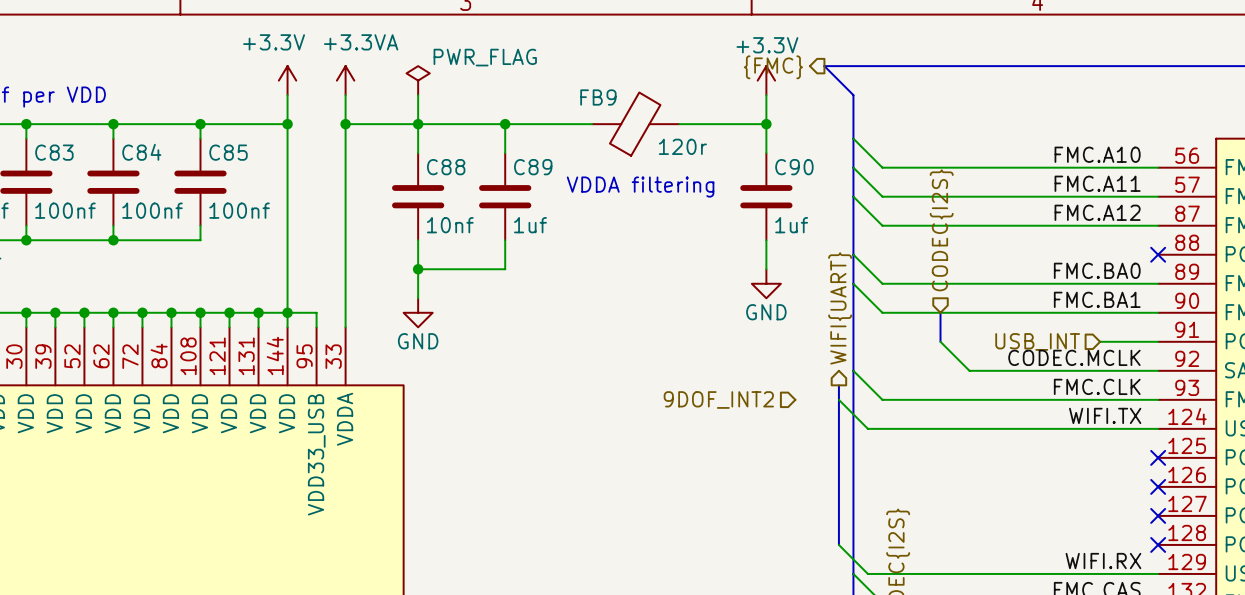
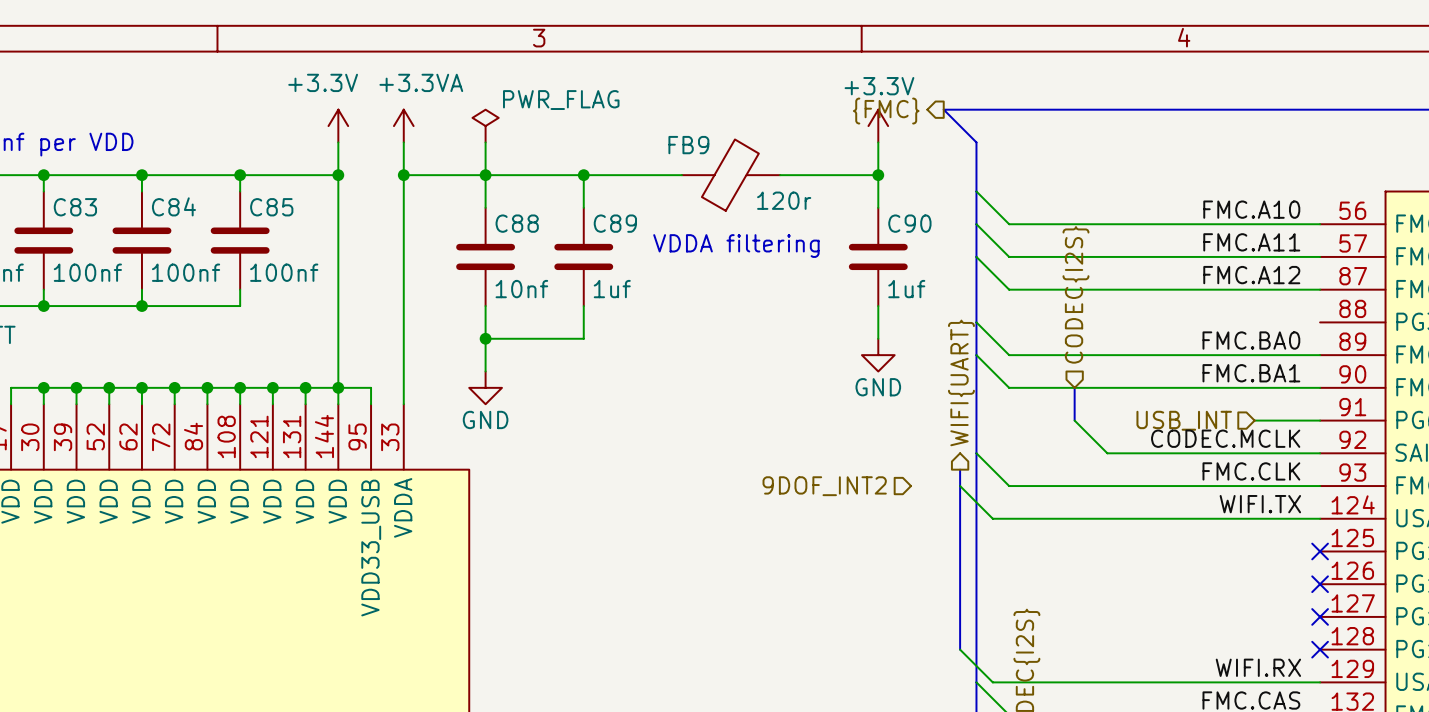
no-connect mark: (1158, 254) -> none

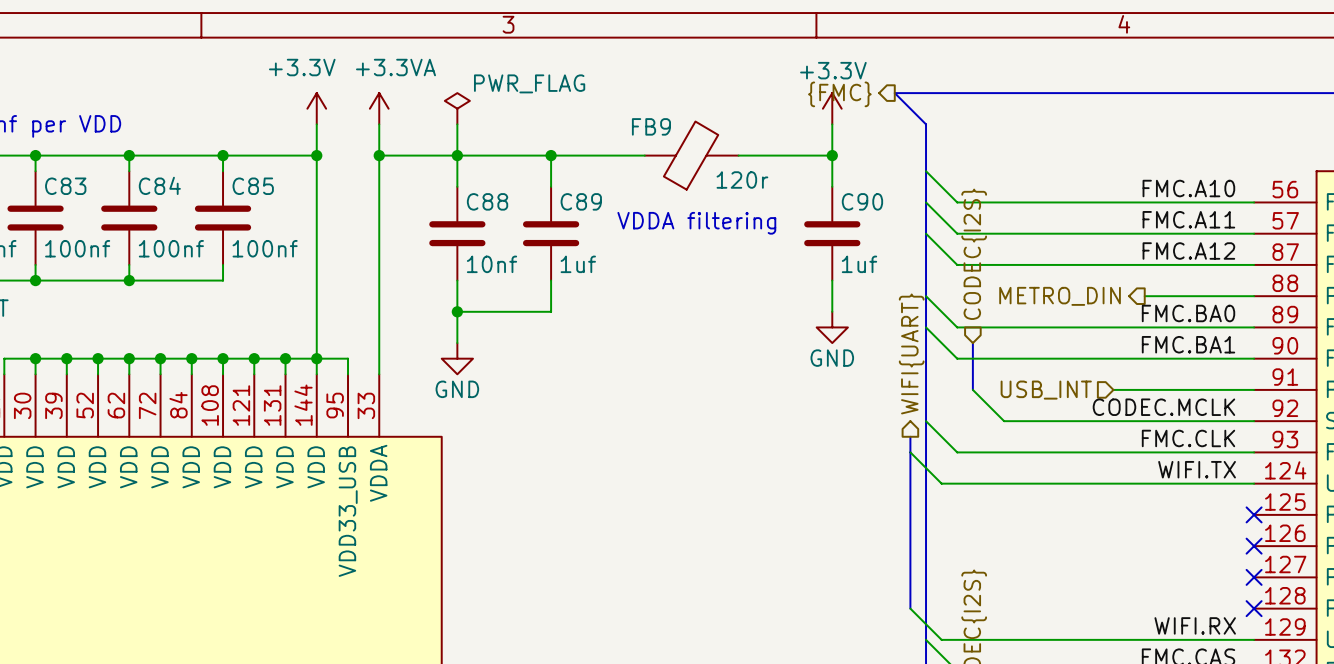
hierarchical label position: CODEC{I2S} (1075, 294) -> CODEC{I2S} (974, 254)
hierarchical label: none -> METRO_DIN (1060, 296)
wire: none -> (1144, 296) (1254, 296)
bus: none -> (972, 343) (972, 389)
bus: (1074, 387) (1074, 420) -> none
wire: (1074, 420) (1107, 453) -> (972, 389) (1004, 421) (1051, 421)
wire: none -> (1113, 389) (1191, 389)
hierarchical label position: USB_INT (1184, 420) -> USB_INT (1046, 390)
hierarchical label: 9DOF_INT2 (824, 486) -> none

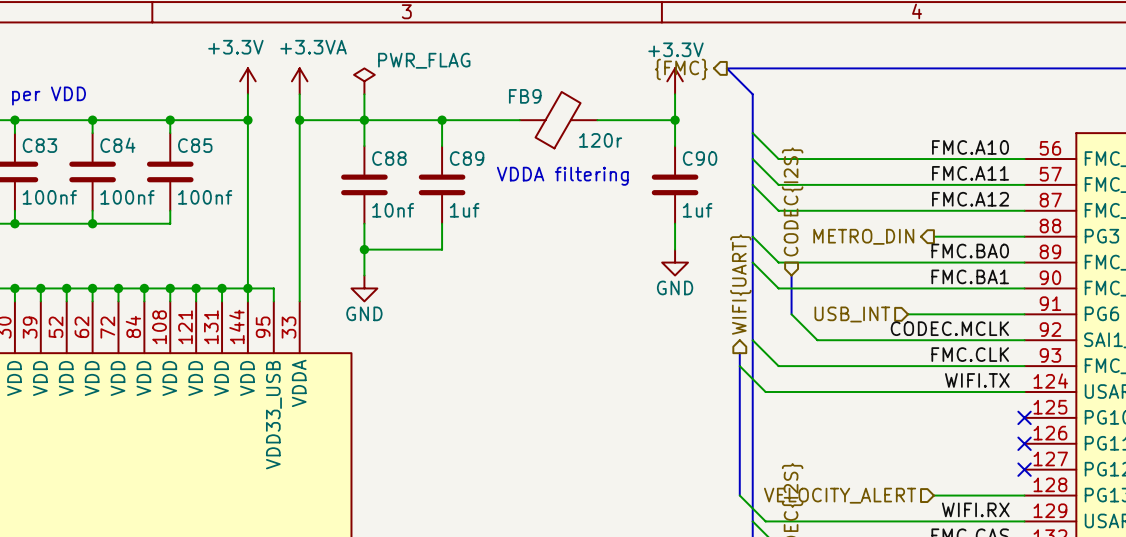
hierarchical label: none -> VELOCITY_ALERT (840, 495)
wire: none -> (933, 495) (1024, 495)
no-connect mark: (1254, 608) -> none

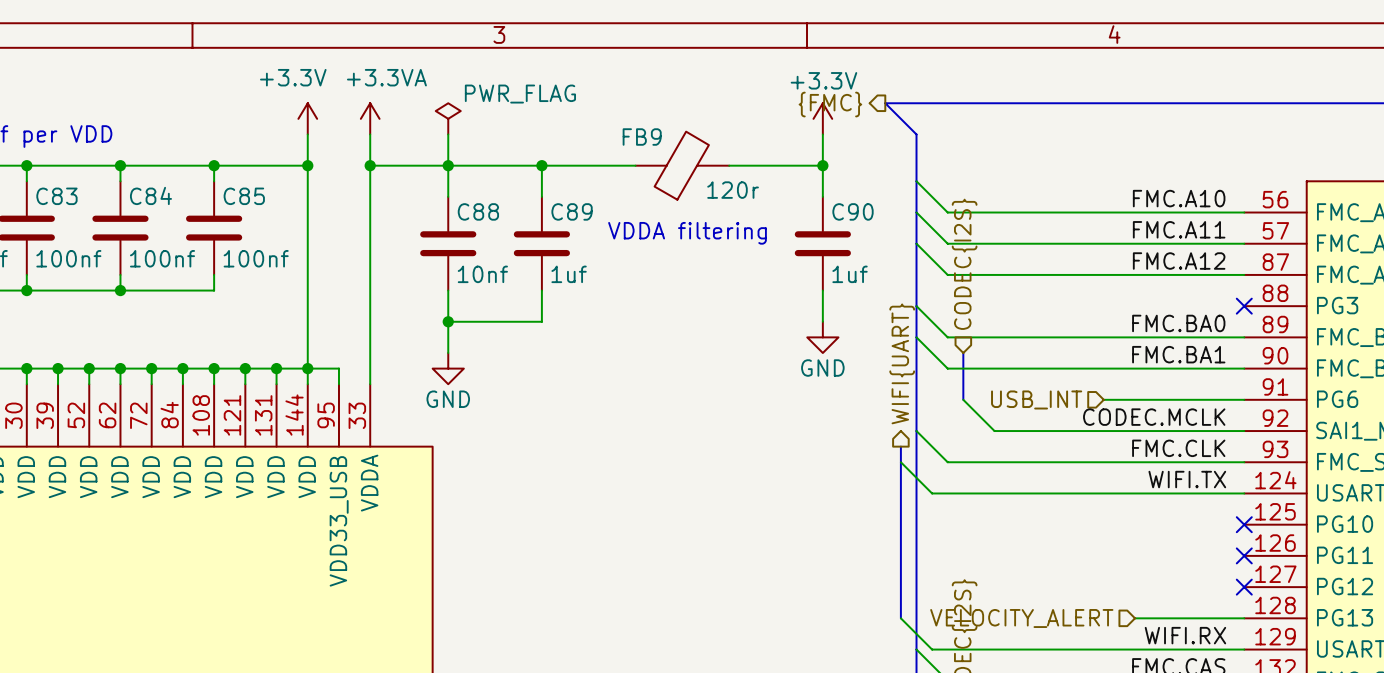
hierarchical label: METRO_DIN (863, 236) -> none
wire: (933, 236) (1024, 236) -> none
no-connect mark: none -> (1244, 306)

